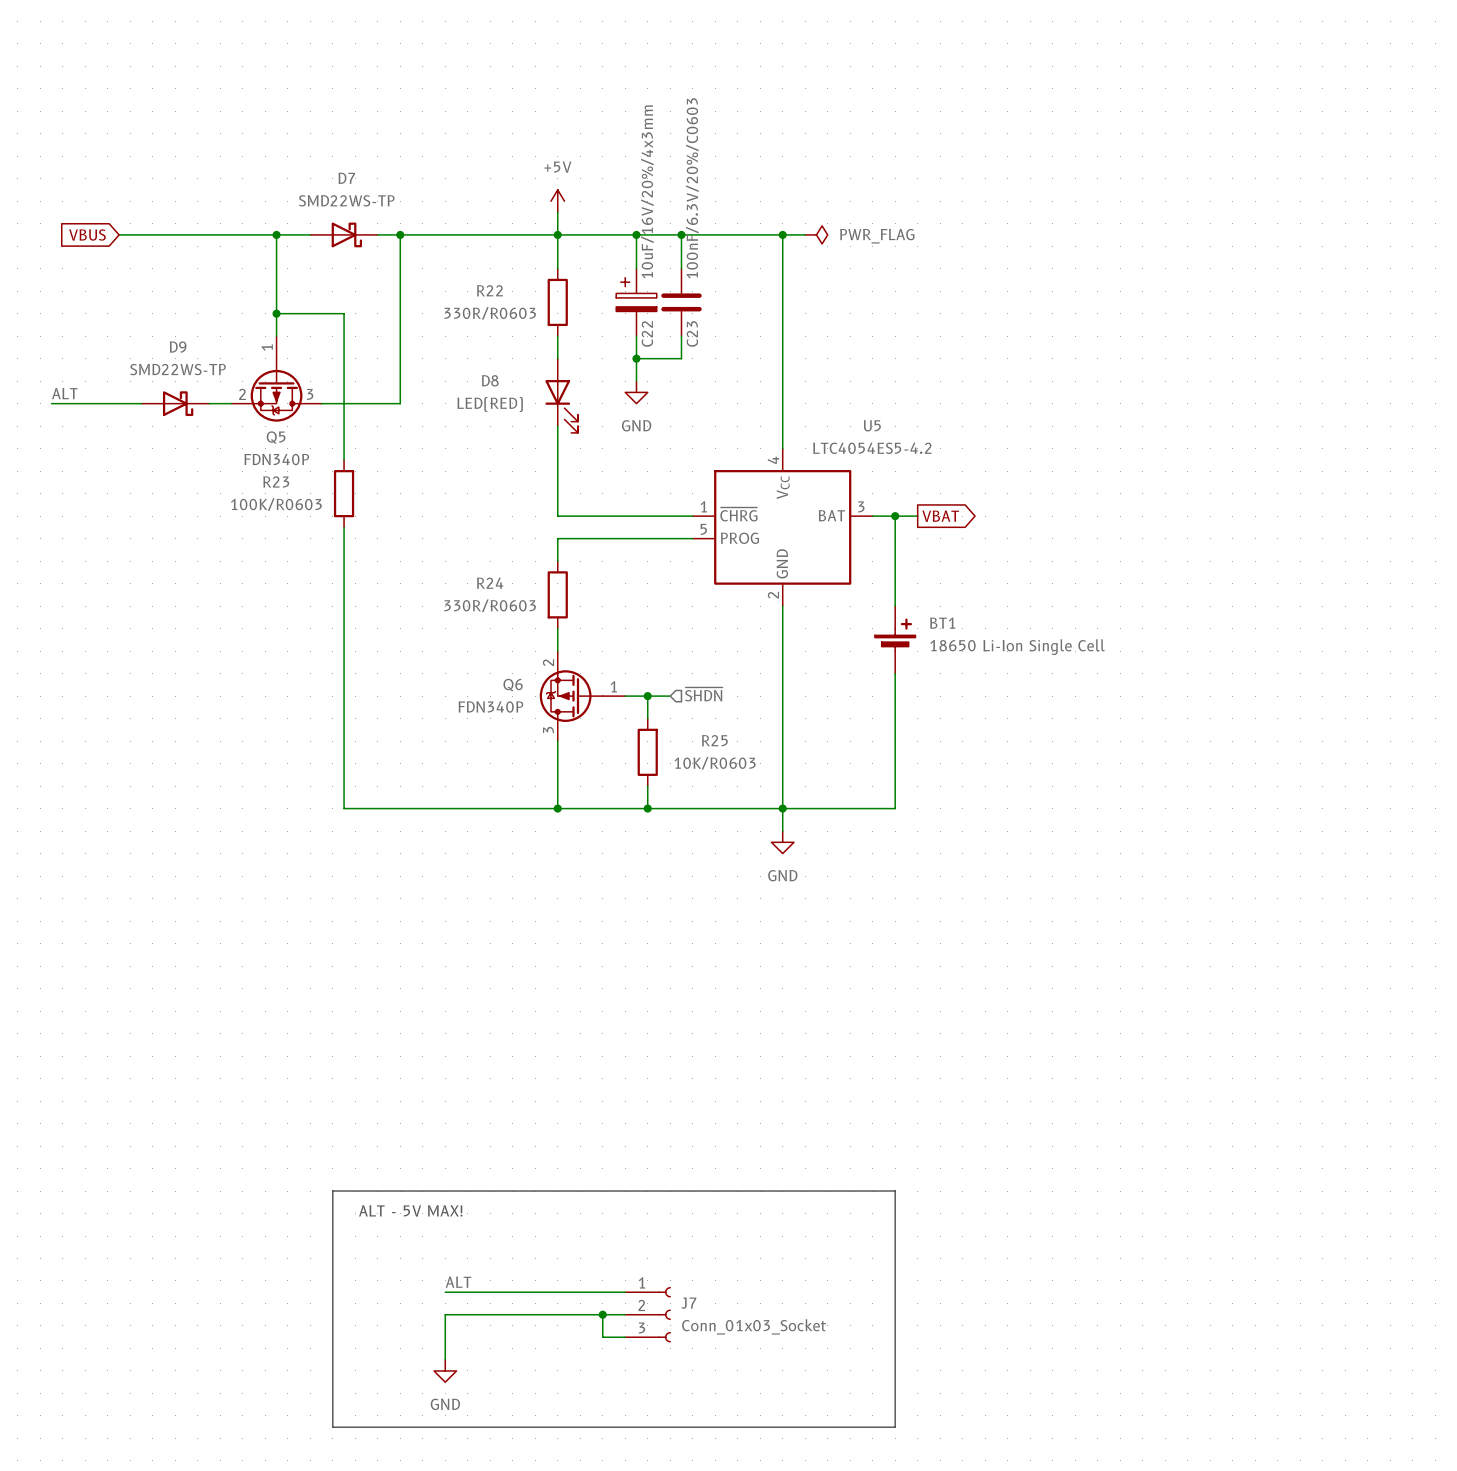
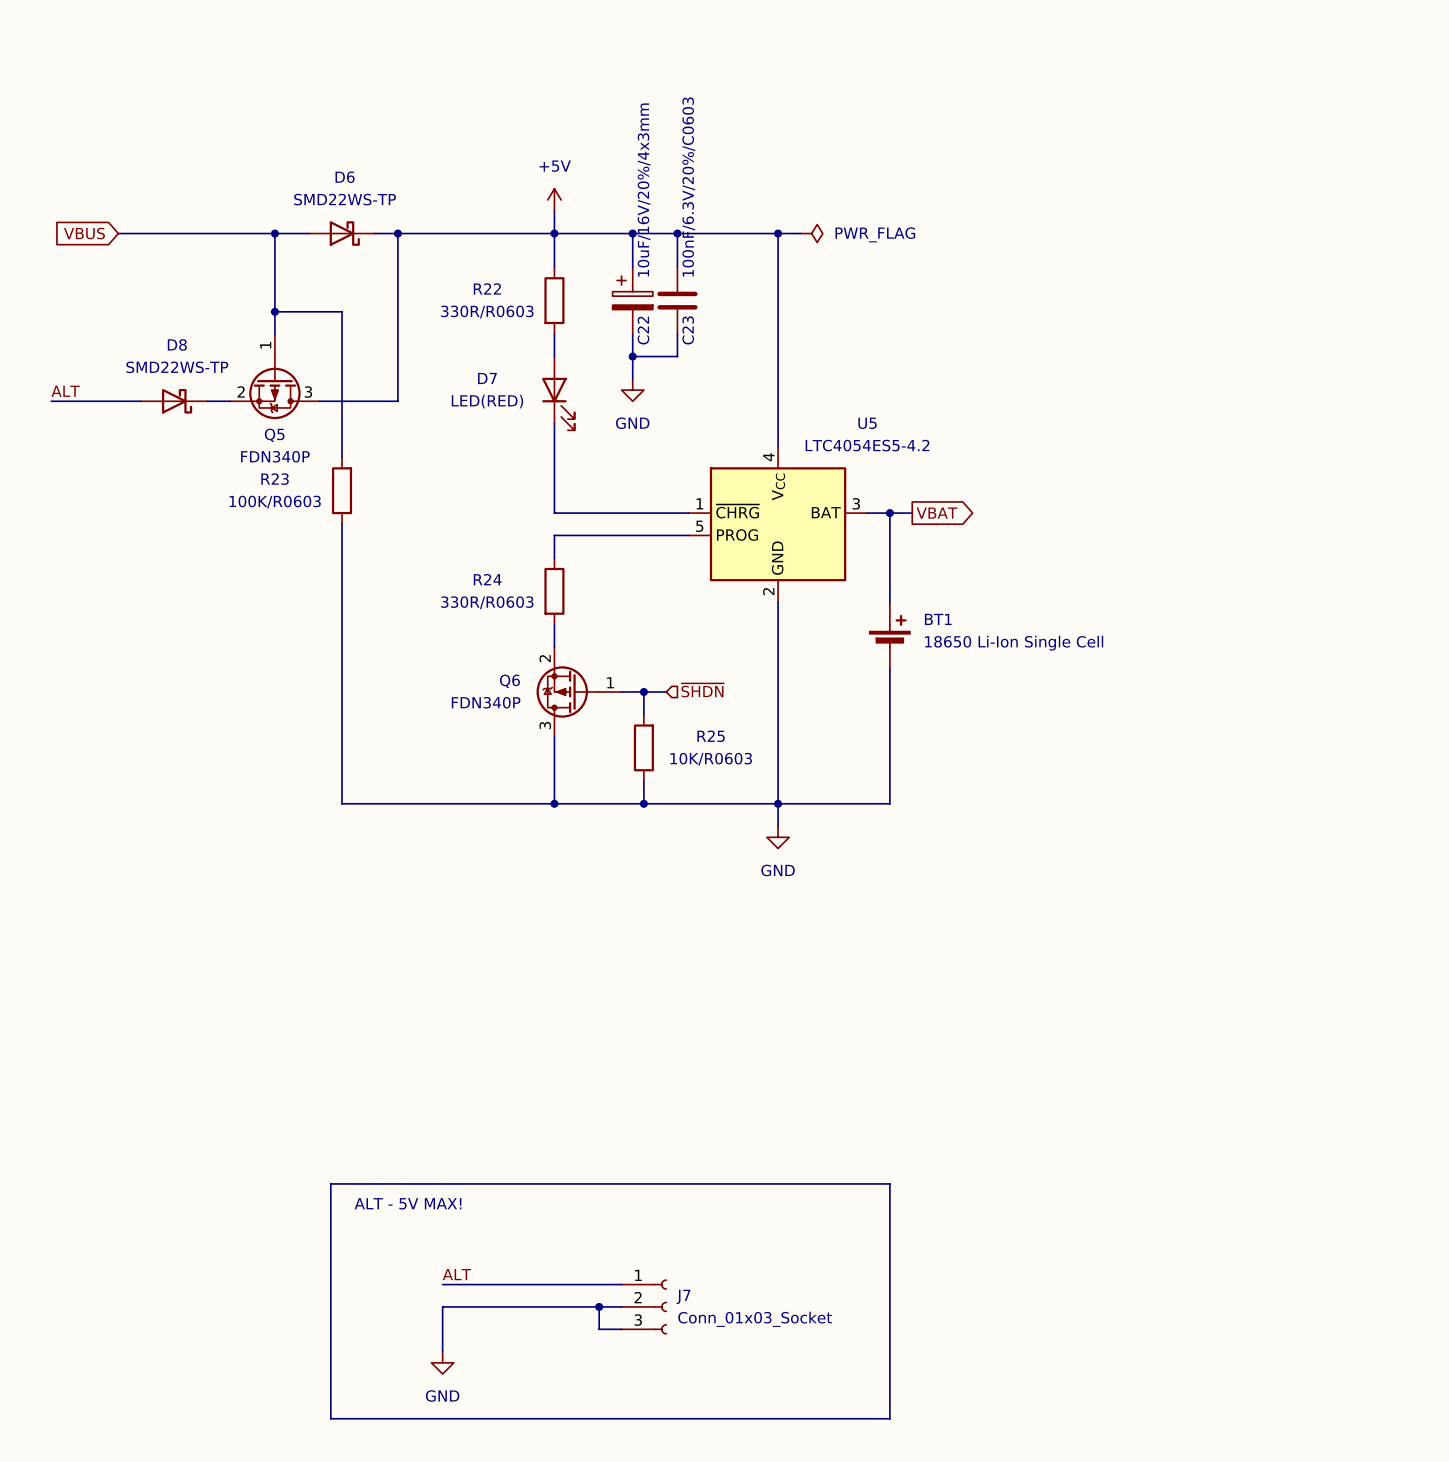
D7 name: D7 (346, 178) -> D6 (345, 177)
D9 name: D9 (178, 347) -> D8 (177, 344)
D8 name: D8 (490, 380) -> D7 (487, 378)

